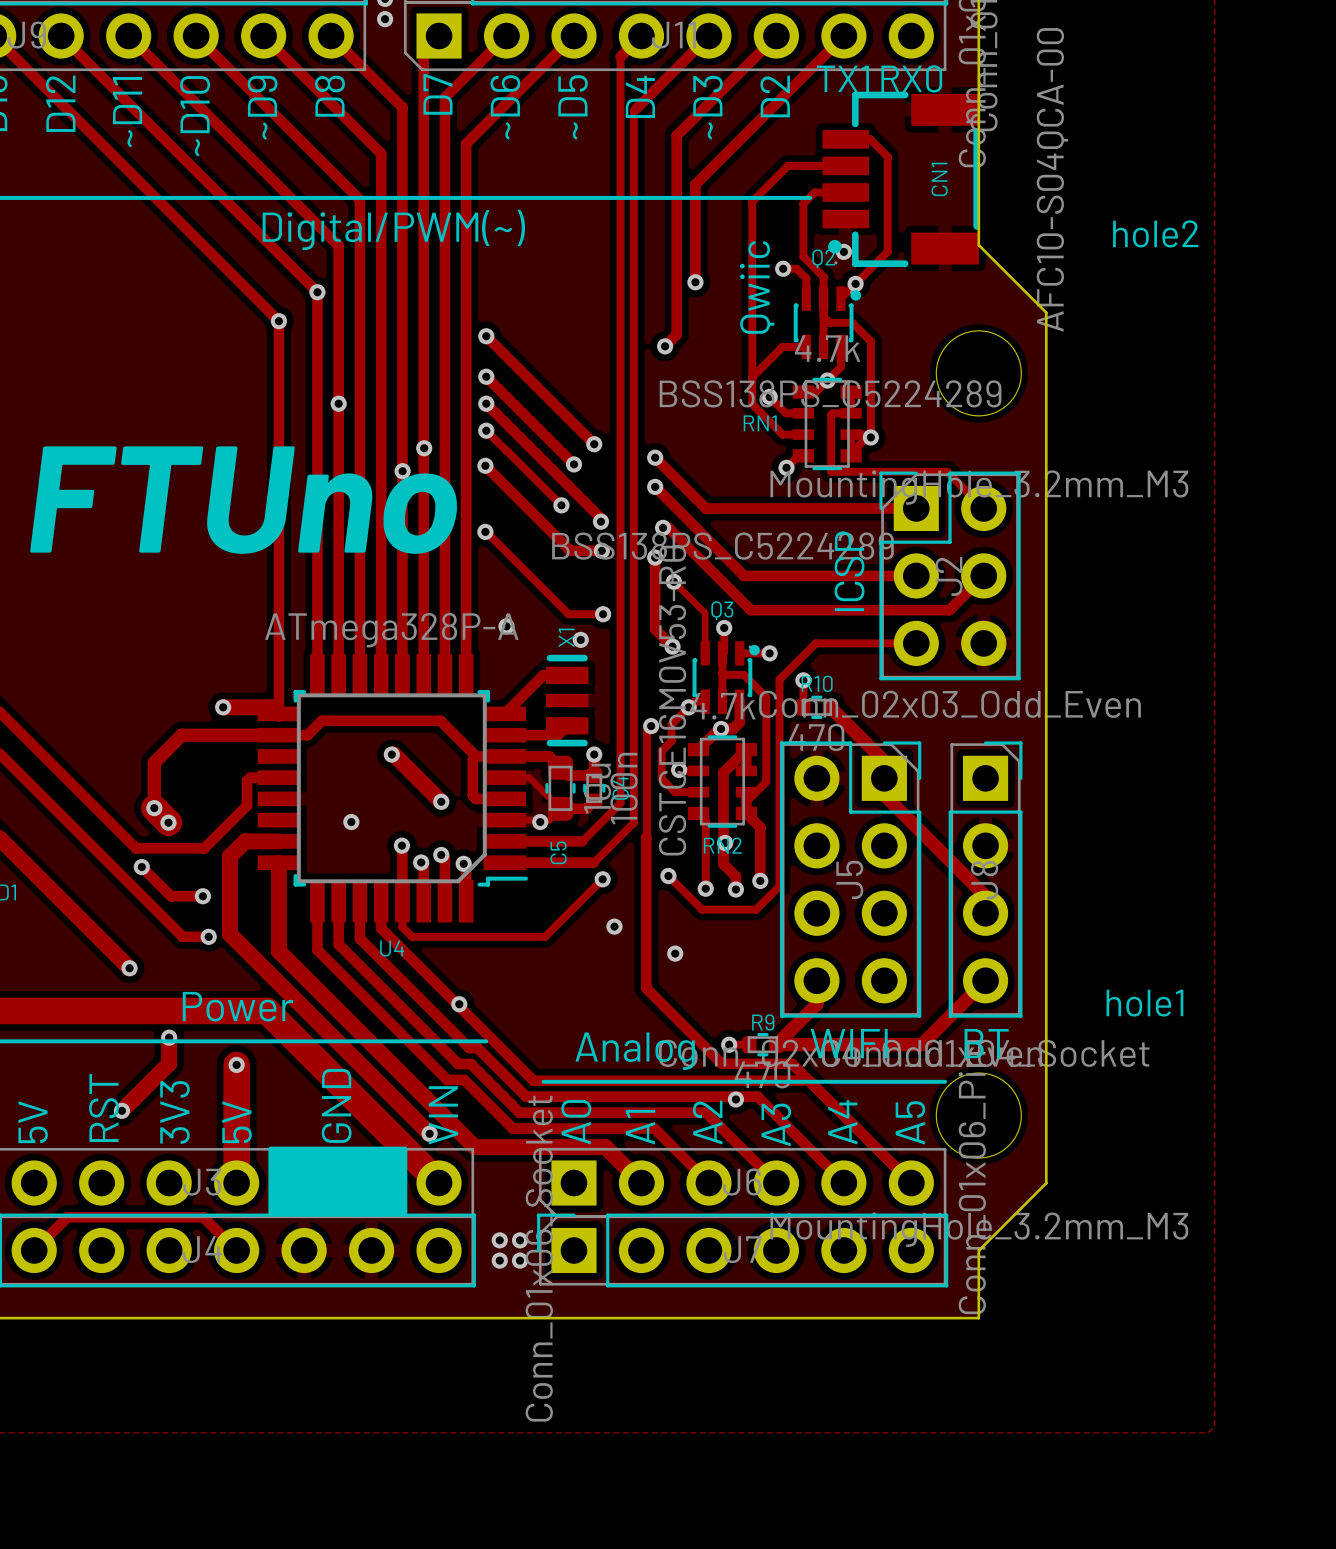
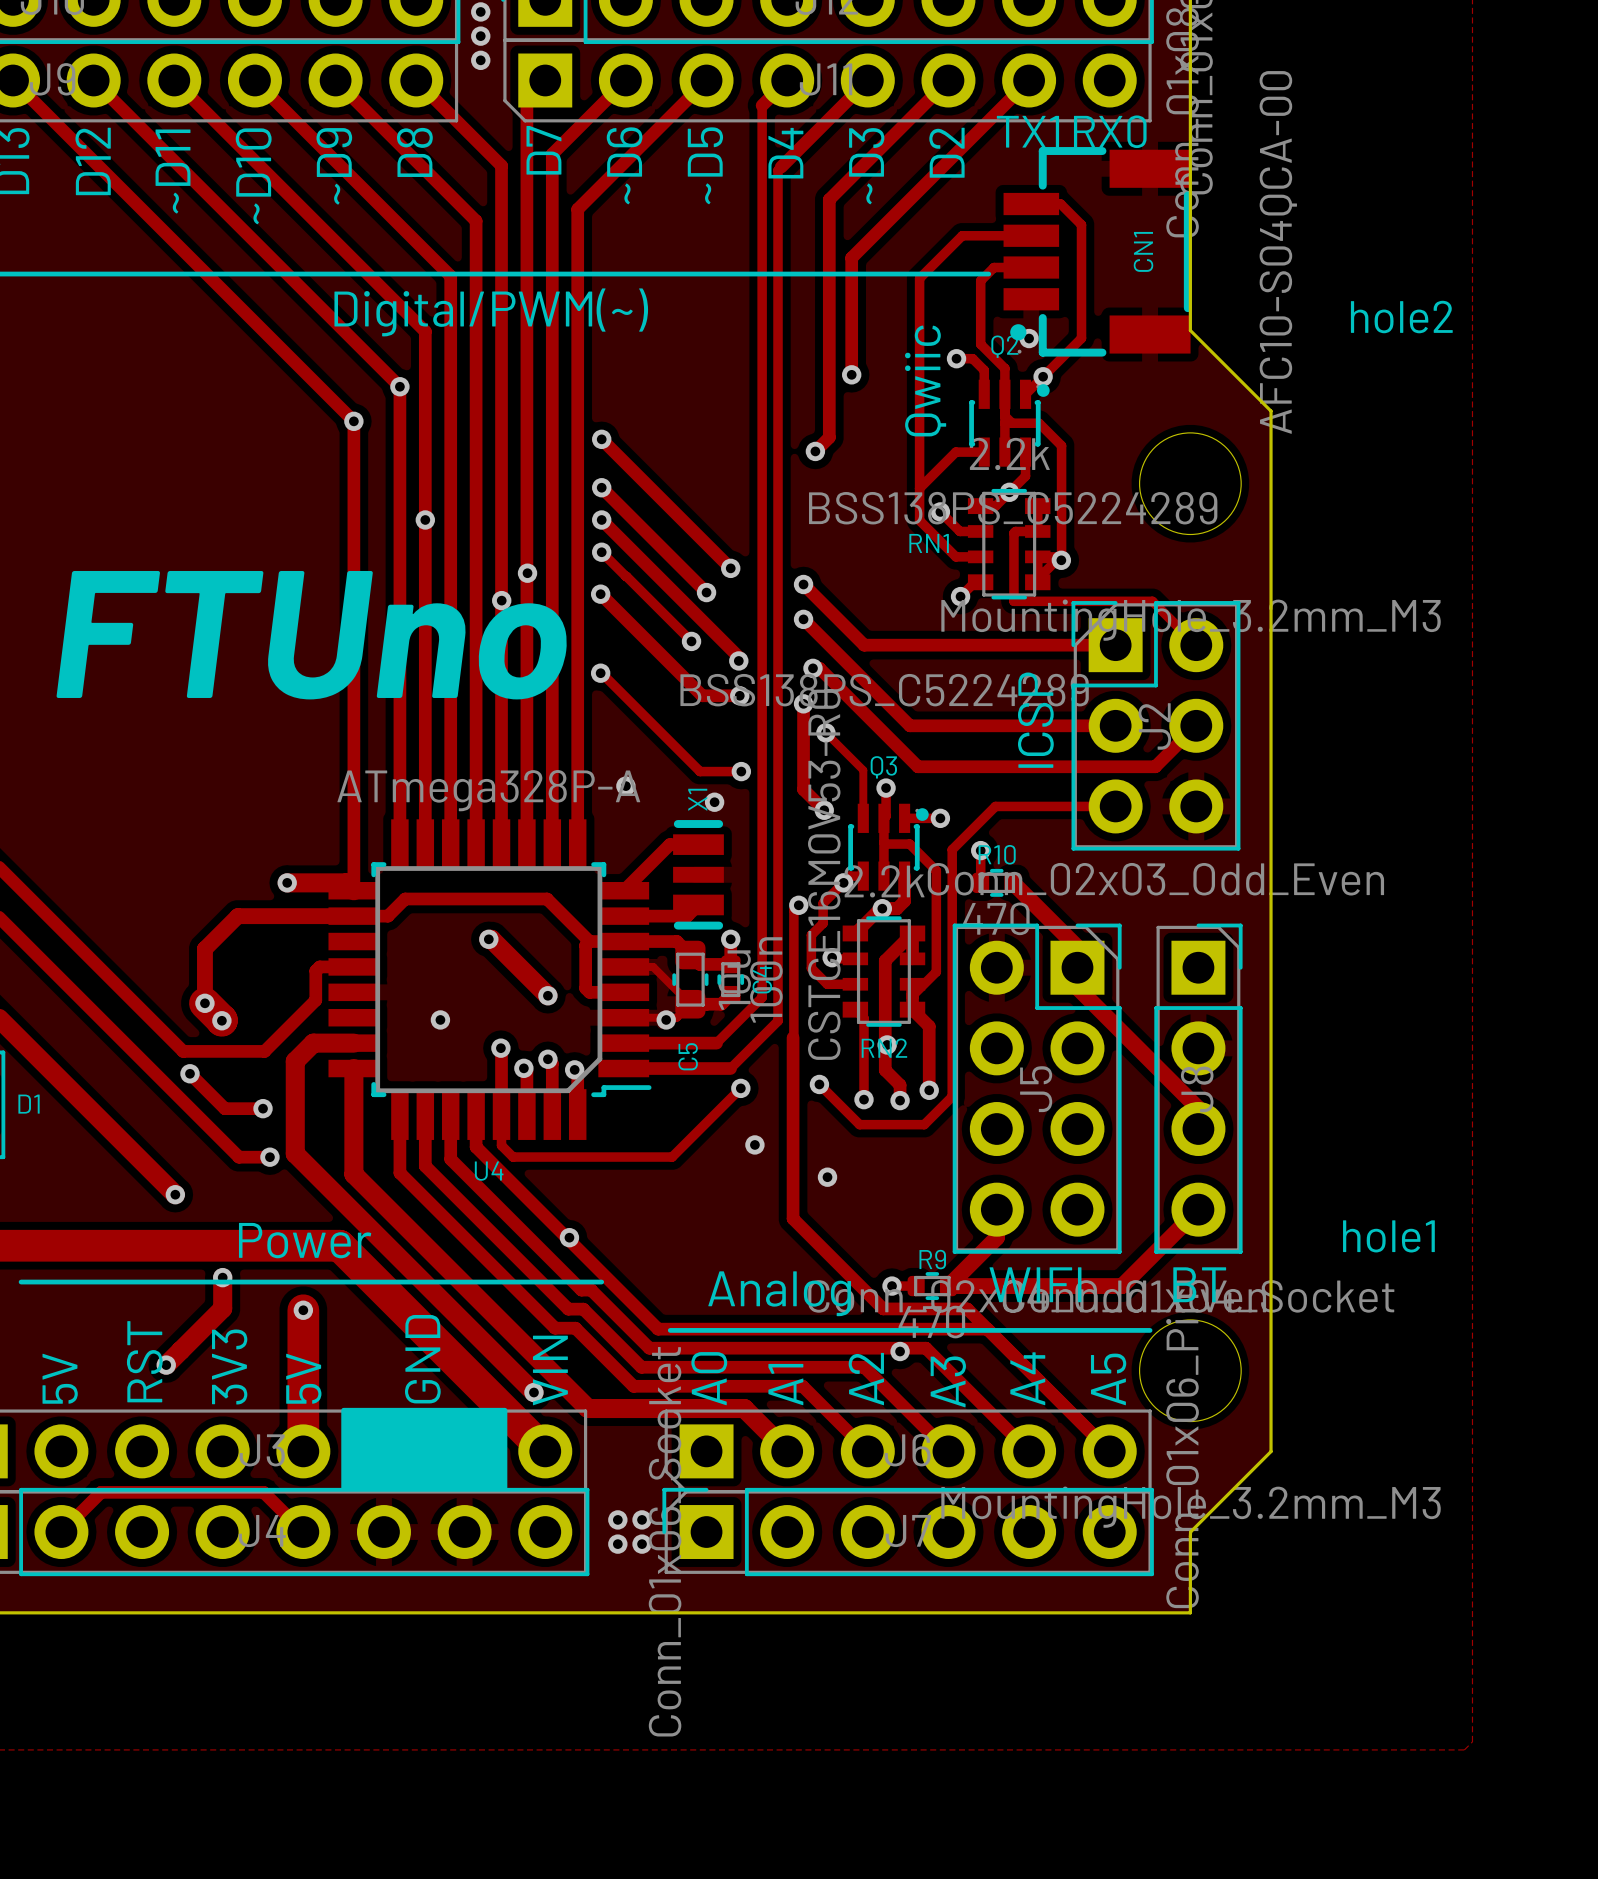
RN1 value: 4.7k (827, 348) -> 2.2k (1009, 453)
RN2 value: 4.7k (722, 706) -> 2.2k (884, 881)

